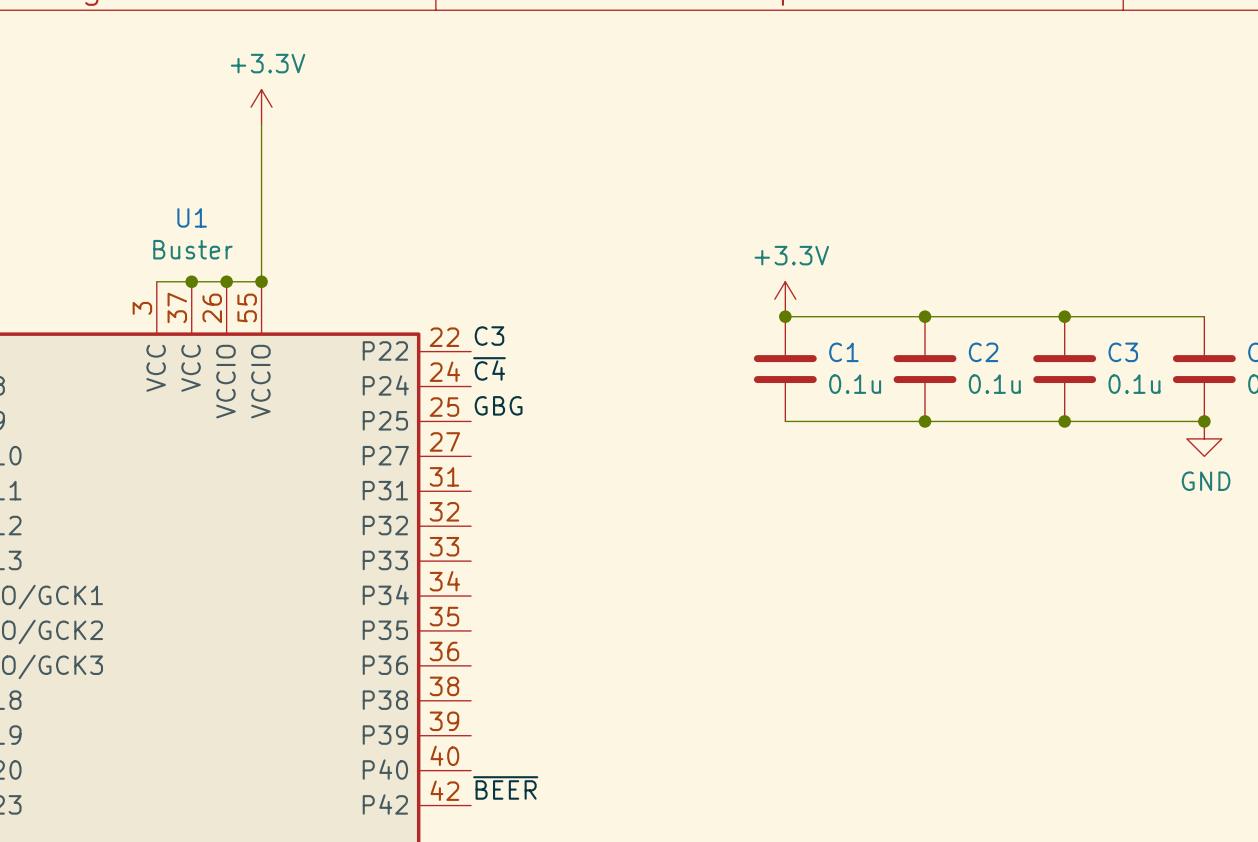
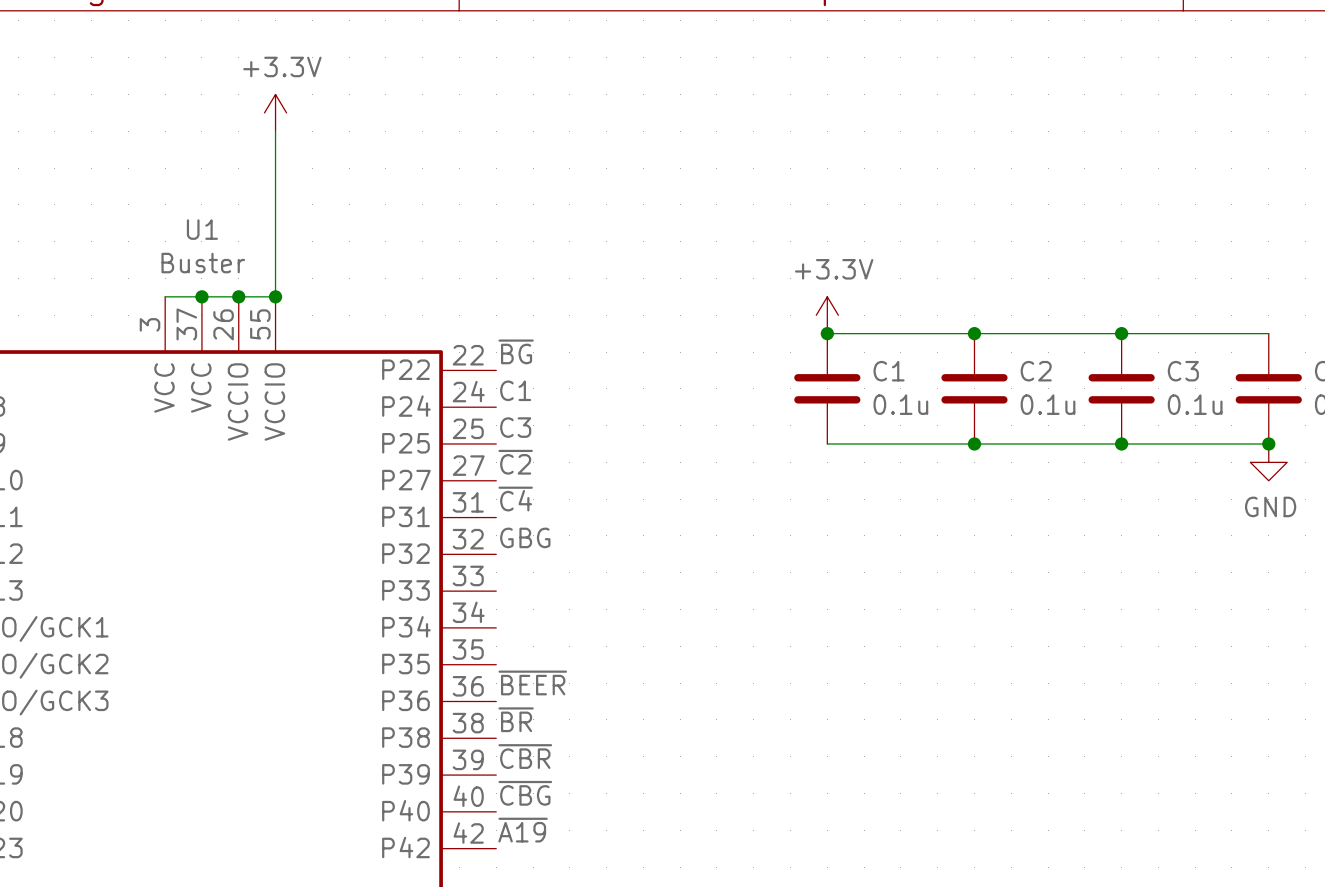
label: C3 (489, 336) -> ~{BG} (516, 351)
label: ~{C4} (489, 368) -> C1 (515, 390)
label: GBG (498, 405) -> C3 (515, 427)
label: none -> ~{C2} (515, 462)
label: none -> ~{C4} (515, 499)
label: none -> GBG (525, 537)
label: none -> ~{BEER} (532, 682)
label: none -> ~{BR} (516, 719)
label: none -> ~{CBR} (525, 756)
label: none -> ~{CBG} (525, 793)
label: ~{BEER} (505, 787) -> ~{A19} (523, 830)

